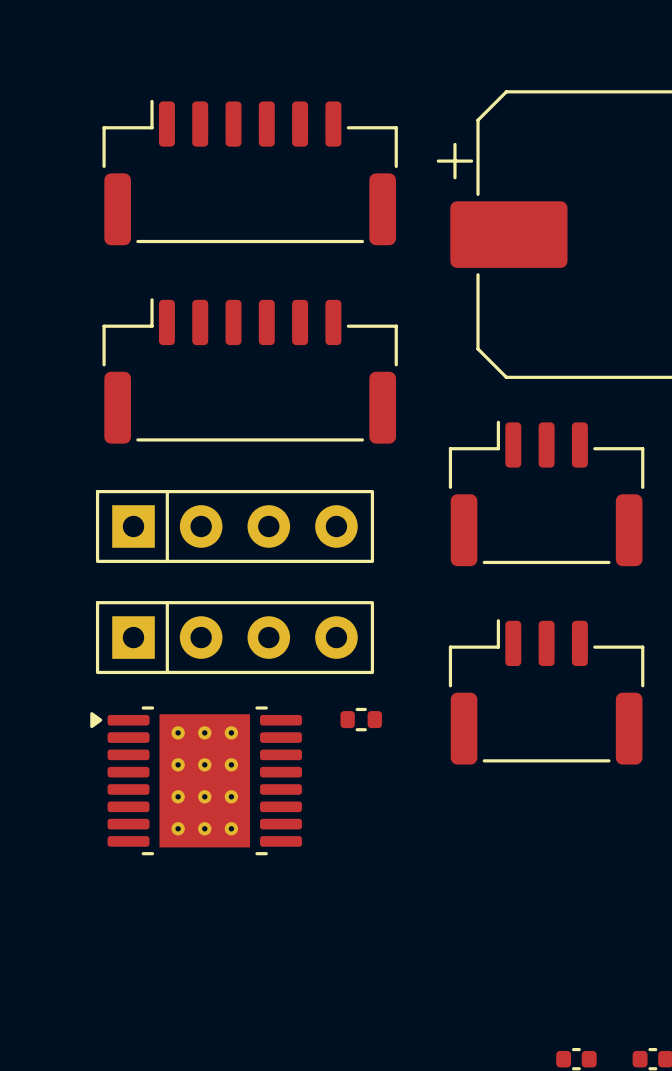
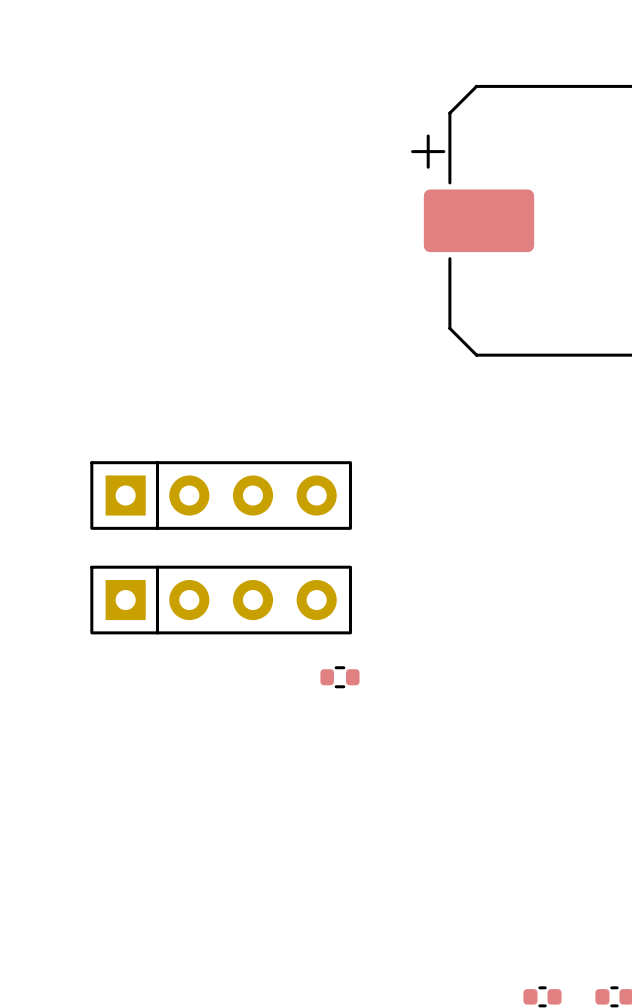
part: (250, 172) -> none
part: (250, 370) -> none
part: (546, 493) -> none
part: (546, 691) -> none
part: (196, 780) -> none

